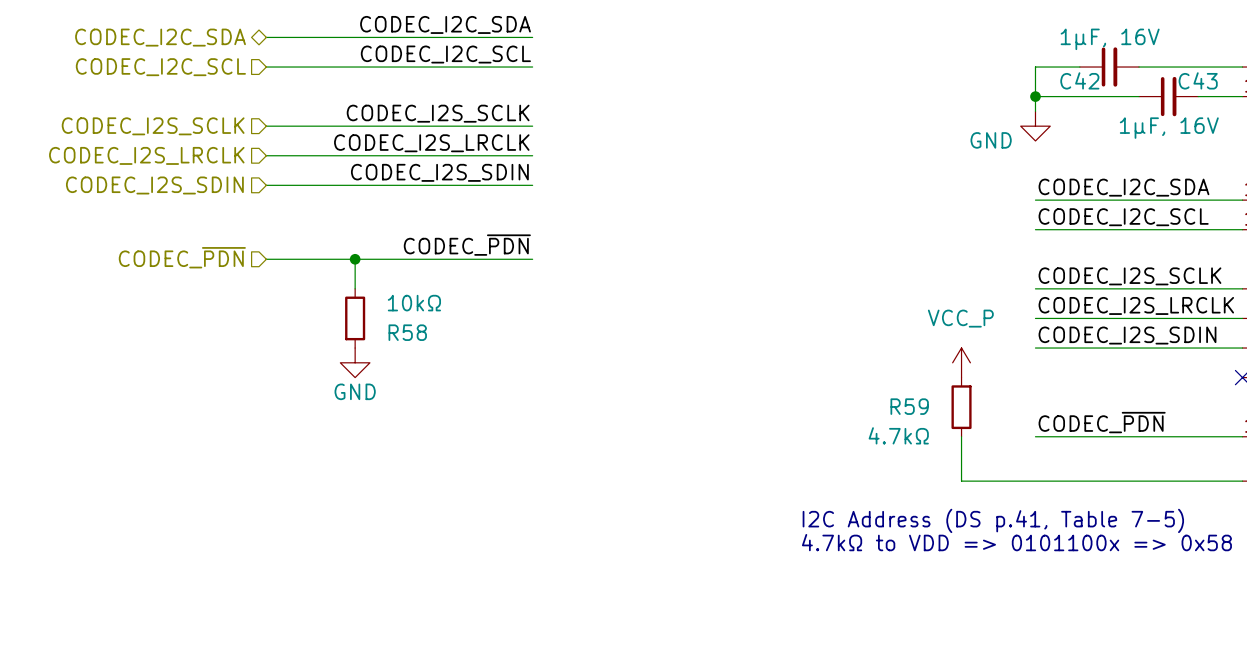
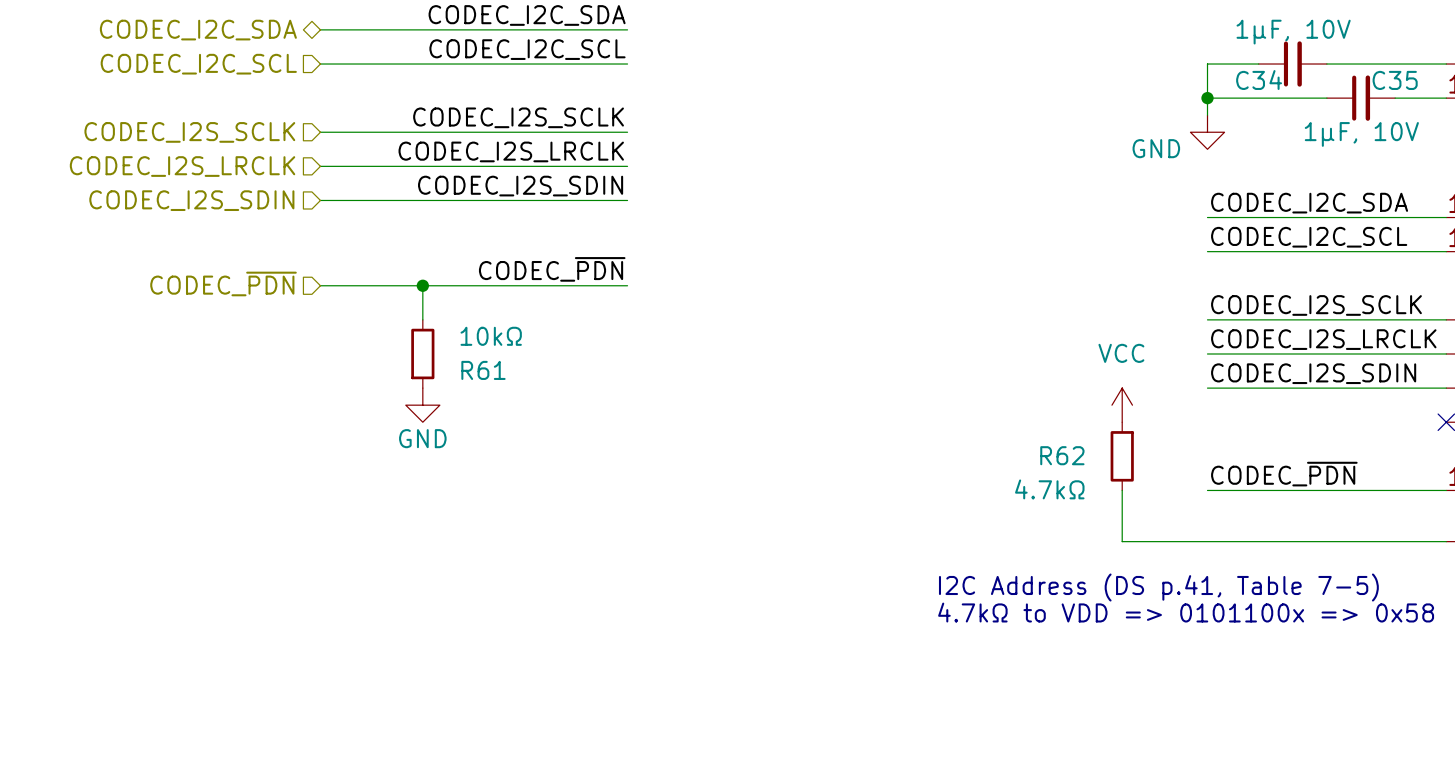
C42 value: 1µF, 16V (1110, 39) -> 1µF, 10V (1293, 32)
C42 name: C42 (1079, 80) -> C34 (1259, 80)
C43 name: C43 (1198, 80) -> C35 (1395, 80)
C43 value: 1µF, 16V (1169, 128) -> 1µF, 10V (1361, 134)
R58 name: R58 (407, 332) -> R61 (483, 370)
power symbol: VCC_P (961, 362) -> VCC (1122, 405)
R59 name: R59 (909, 406) -> R62 (1062, 455)

